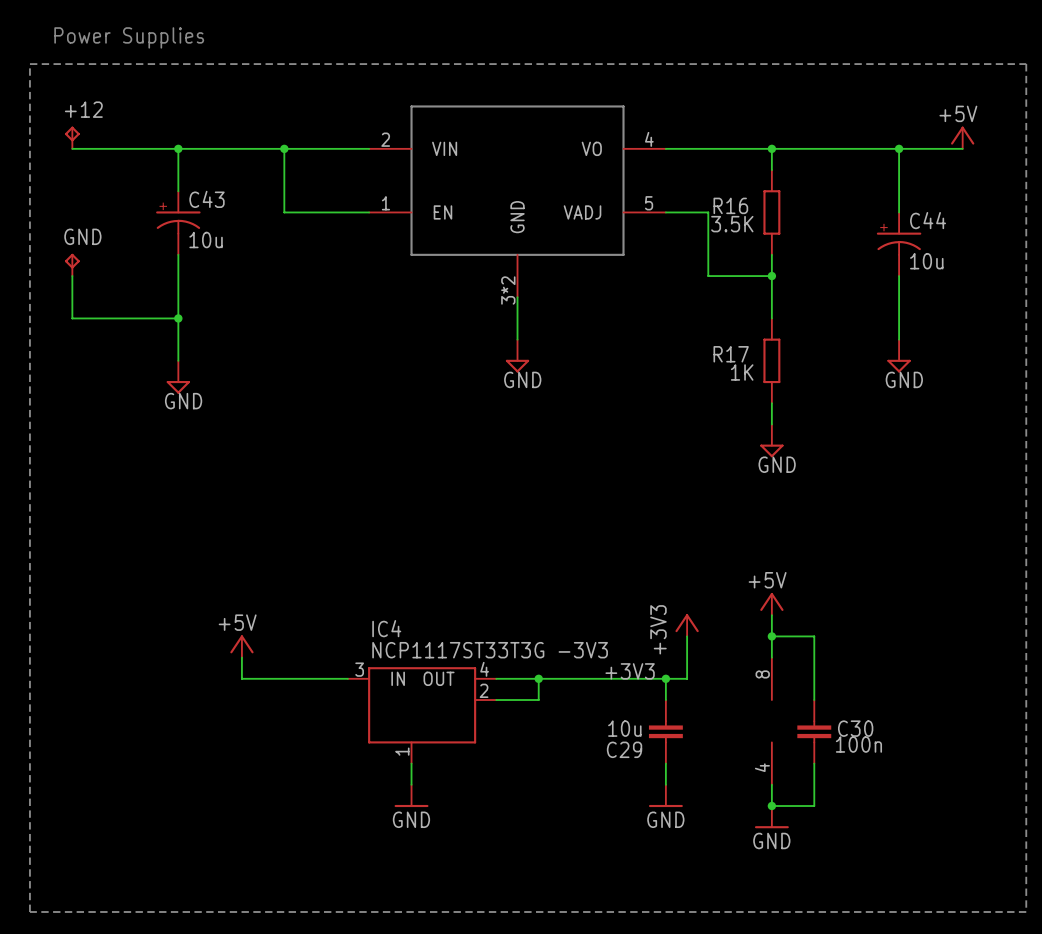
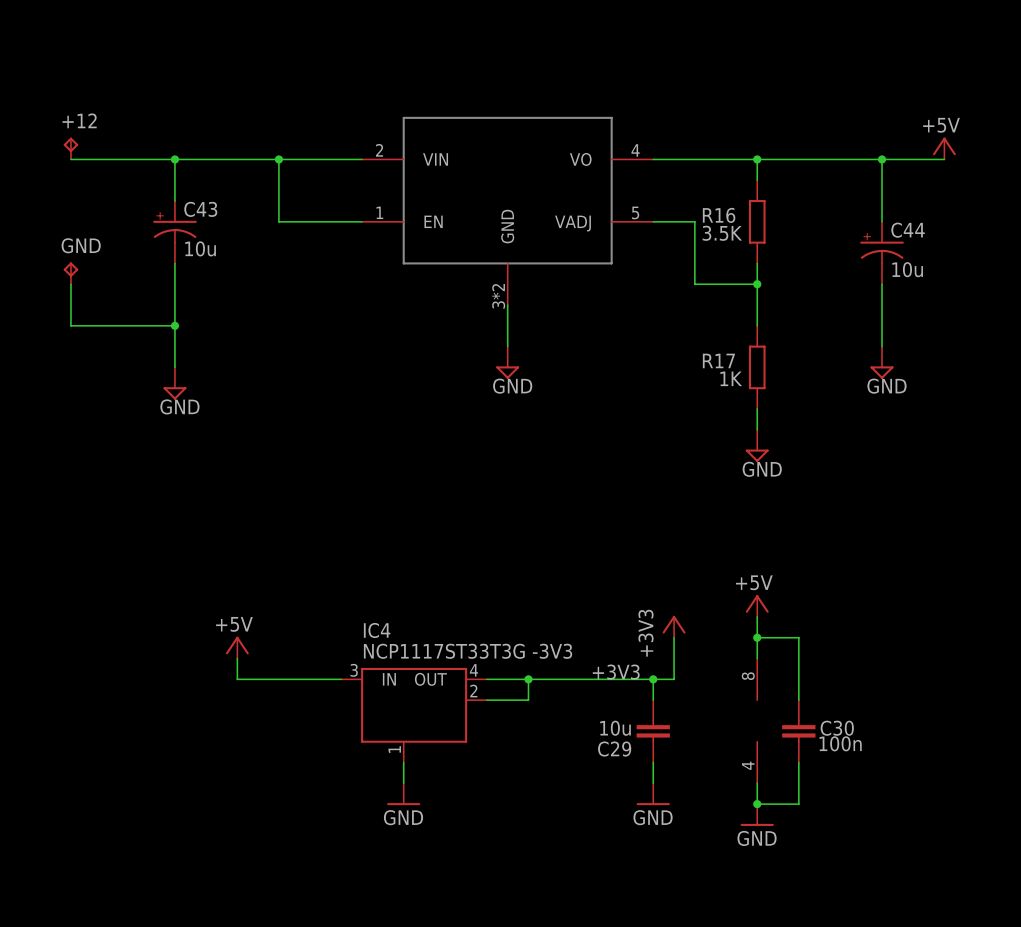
text: Power Supplies (129, 37) -> none
line: (29, 64) (1026, 64) (1026, 911) (29, 911) (29, 64) -> none

